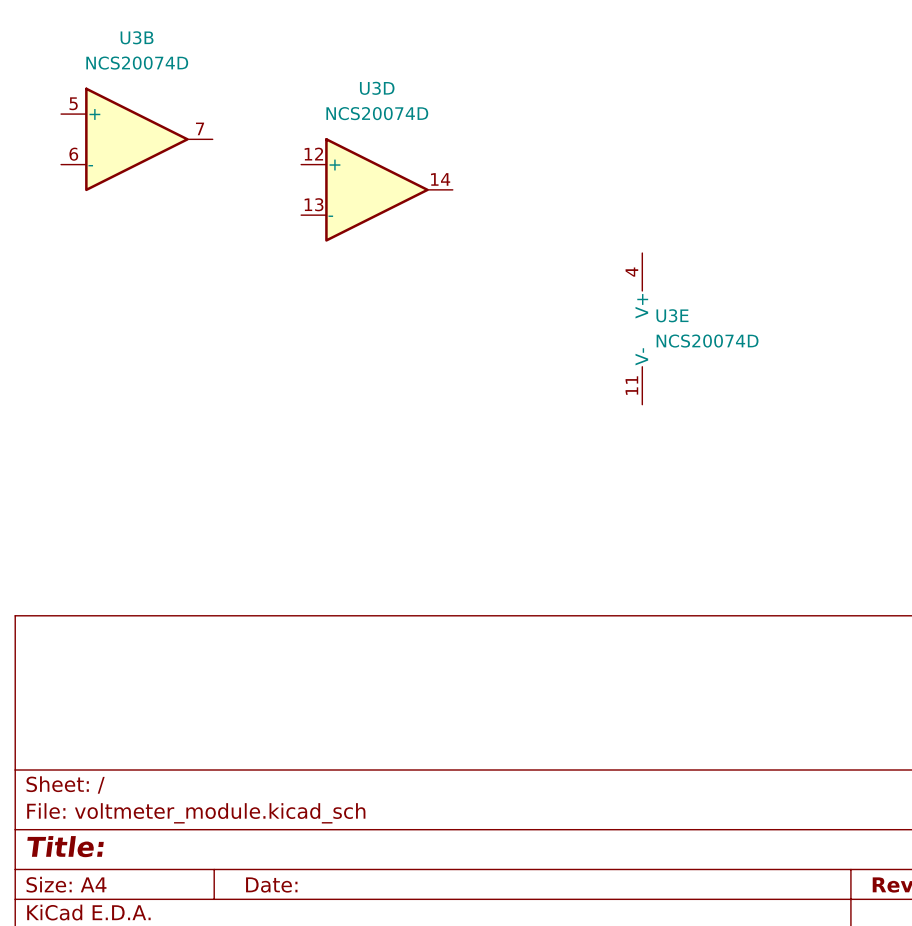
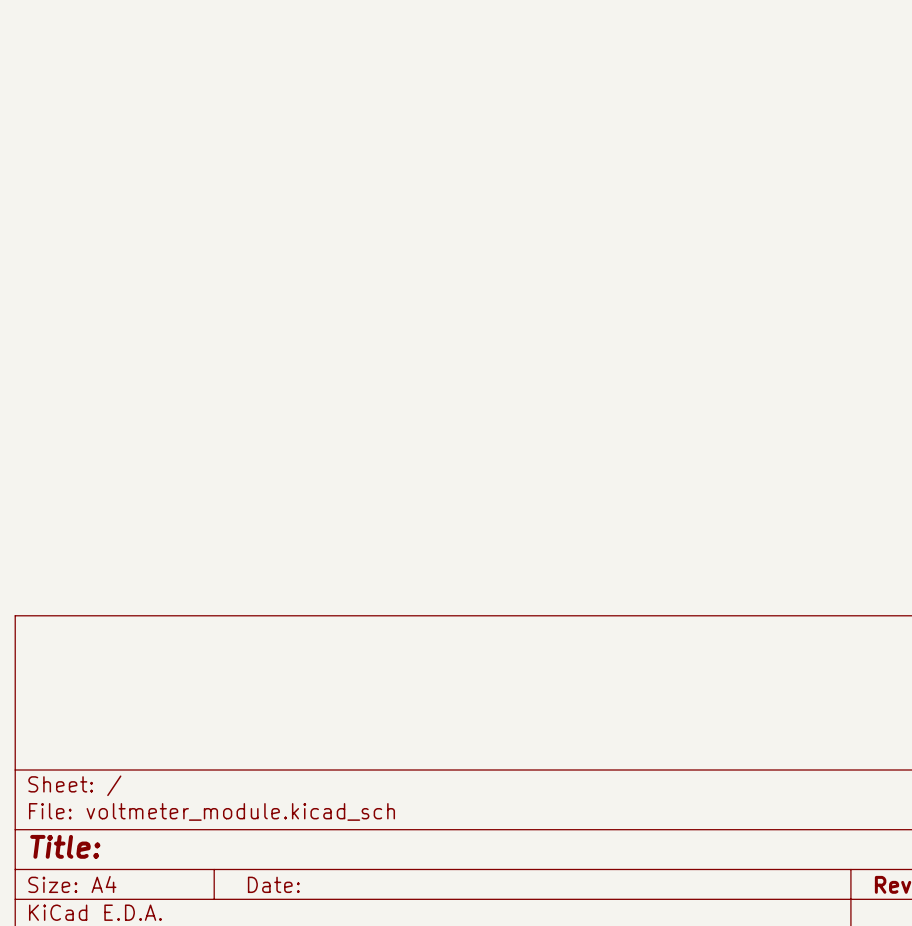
U3B: NCS20074D (136, 139) -> none
U3D: NCS20074D (376, 189) -> none
U3E: NCS20074D (642, 328) -> none

